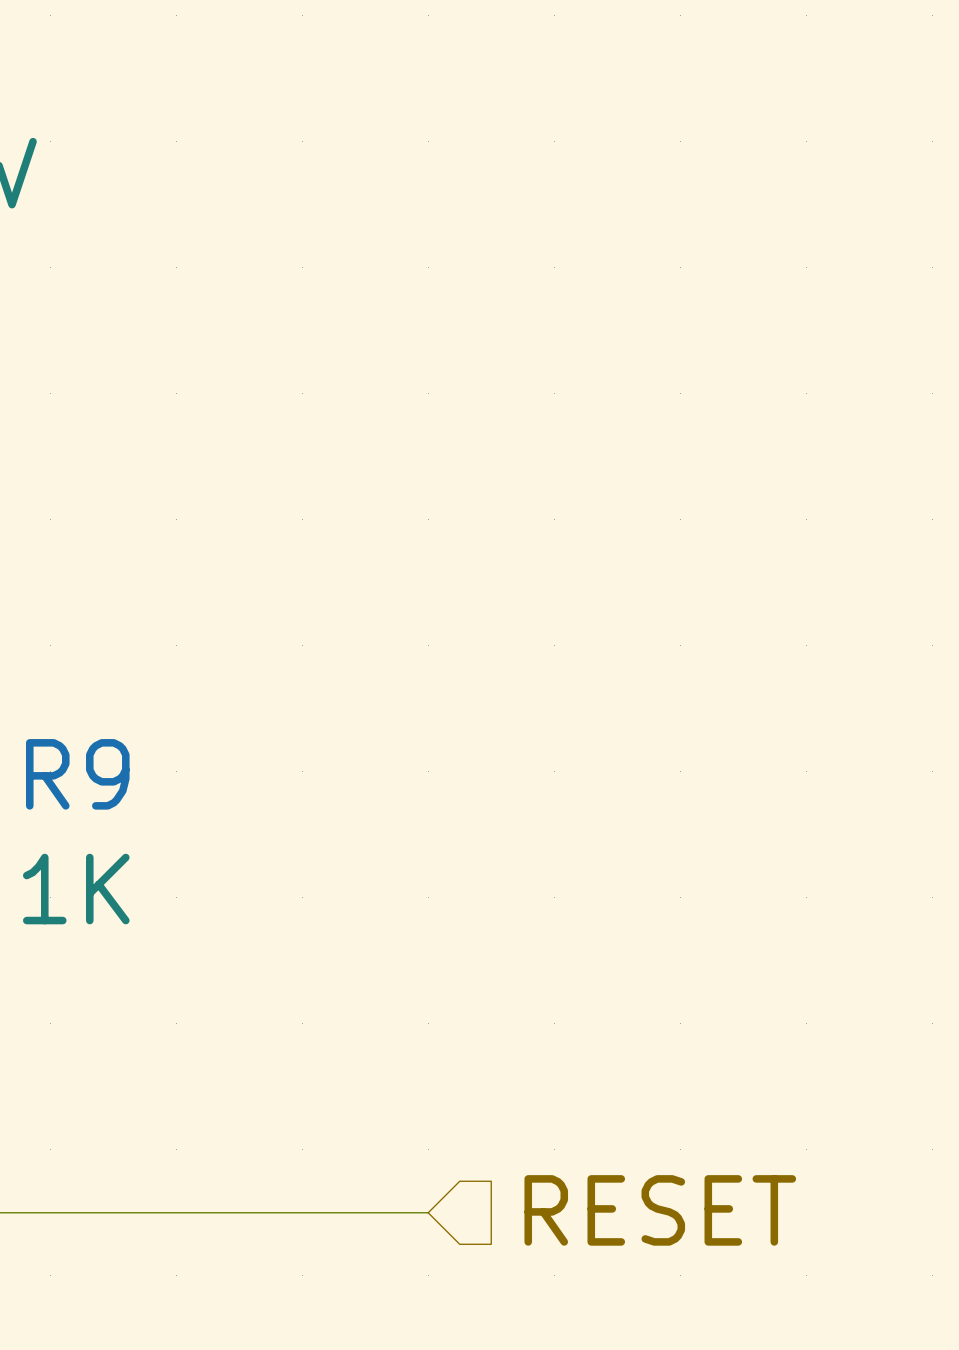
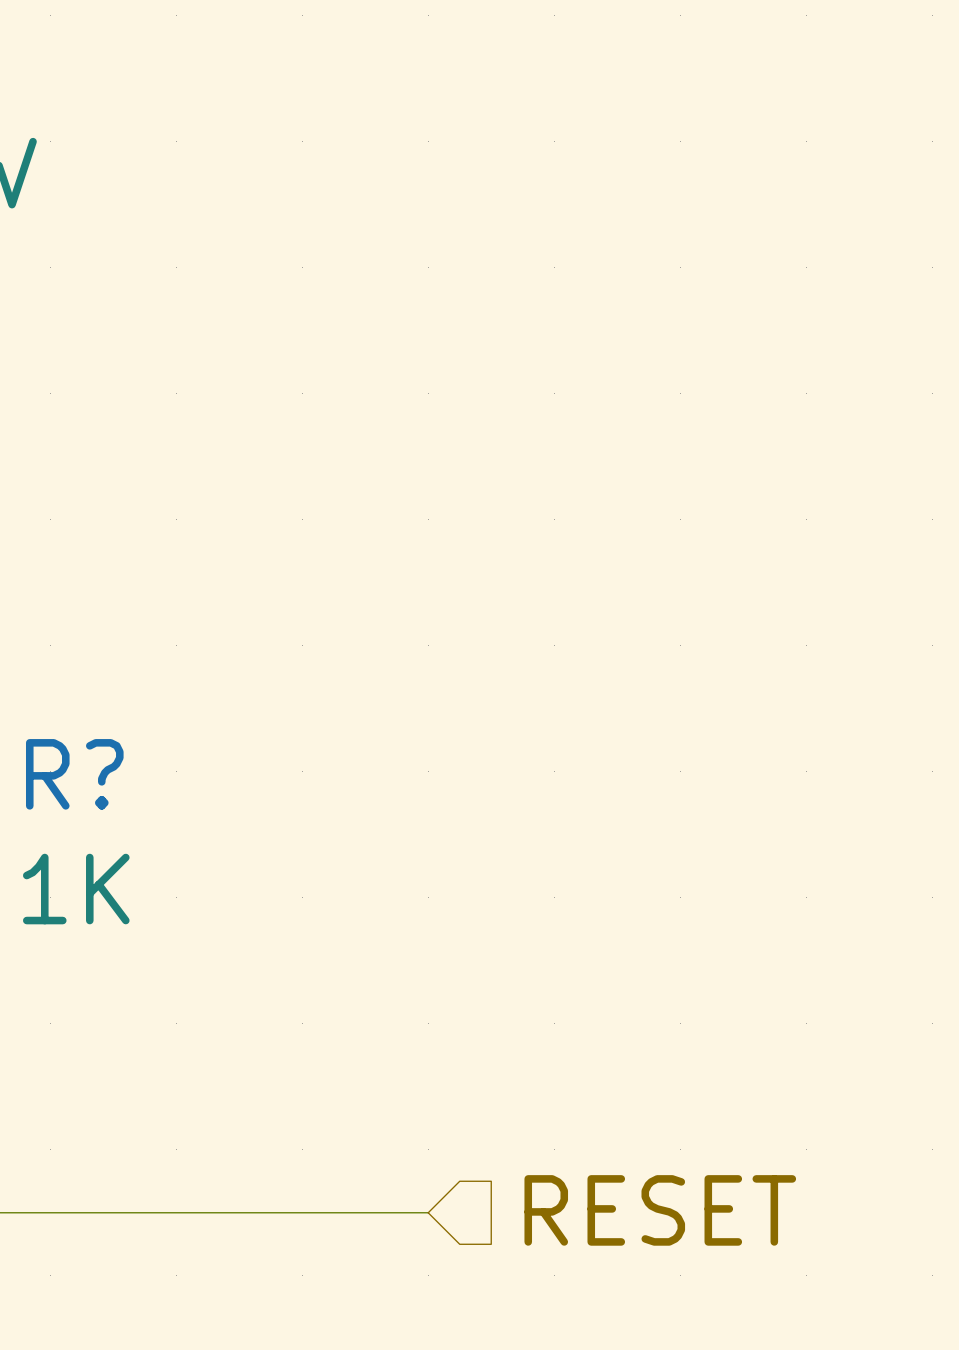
R9 name: R9 (77, 774) -> R? (74, 774)

